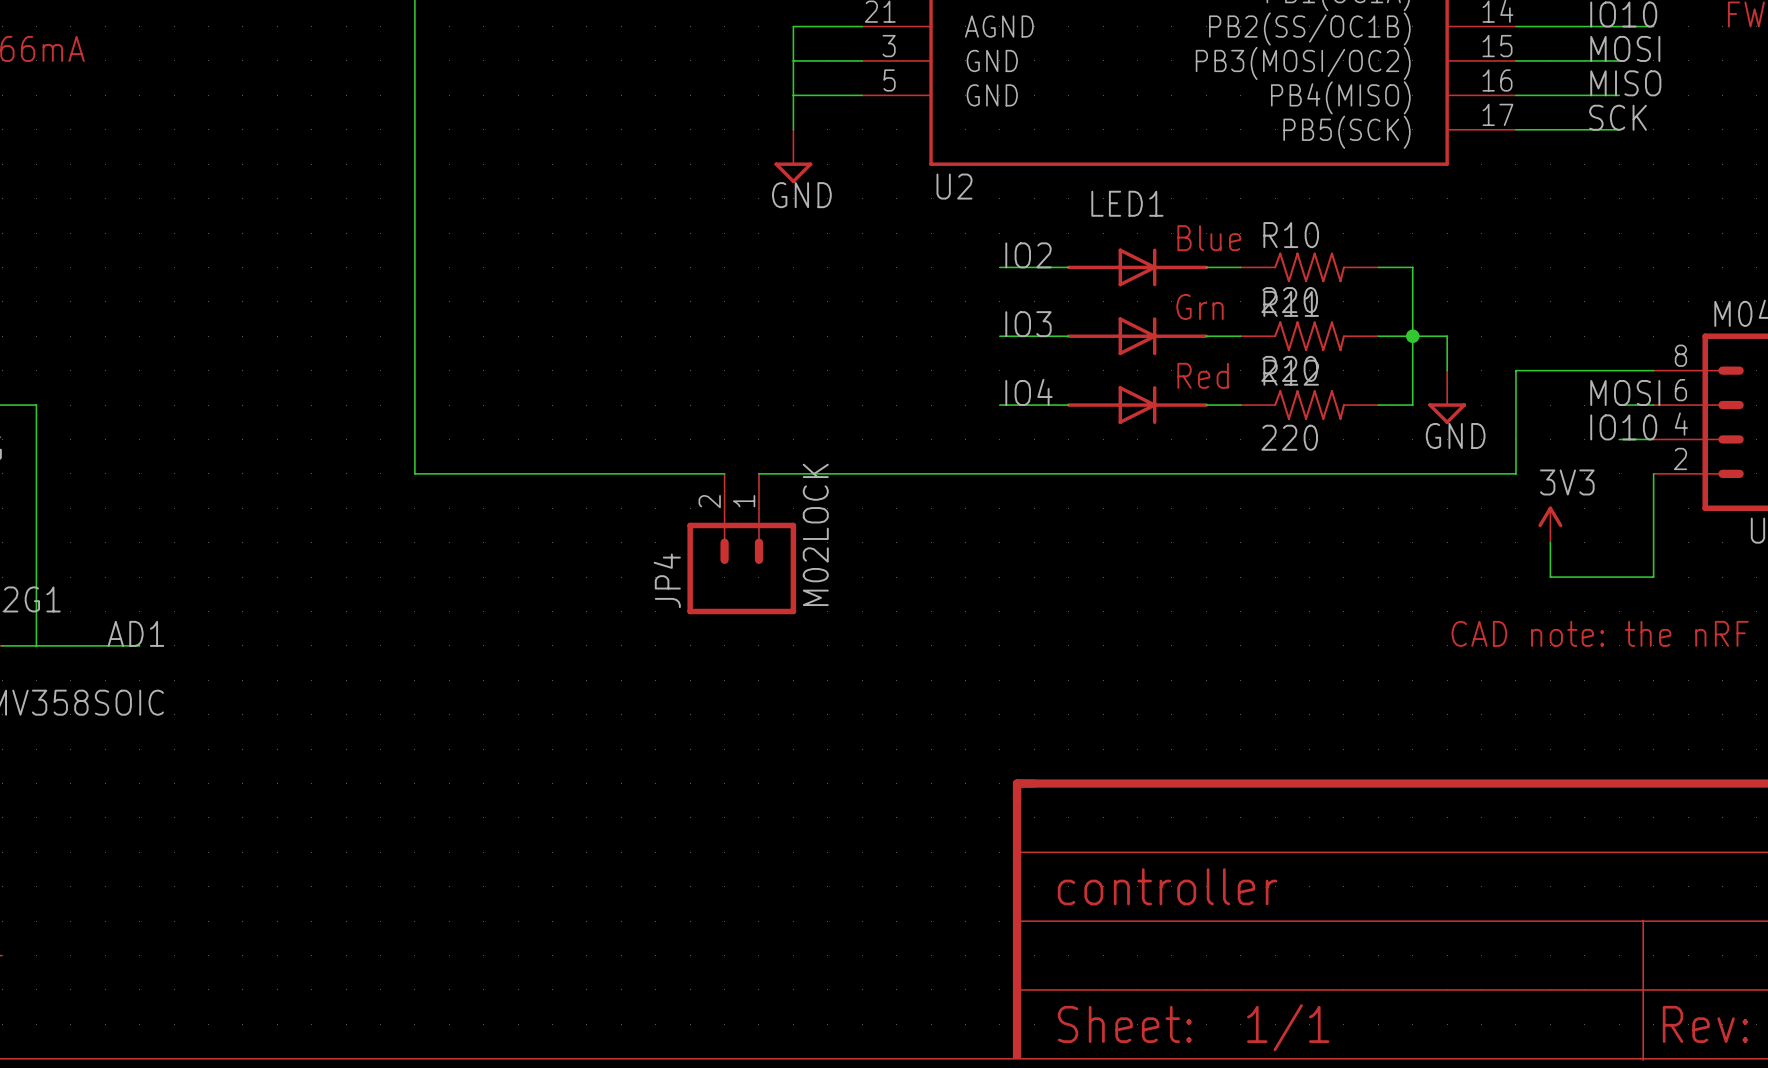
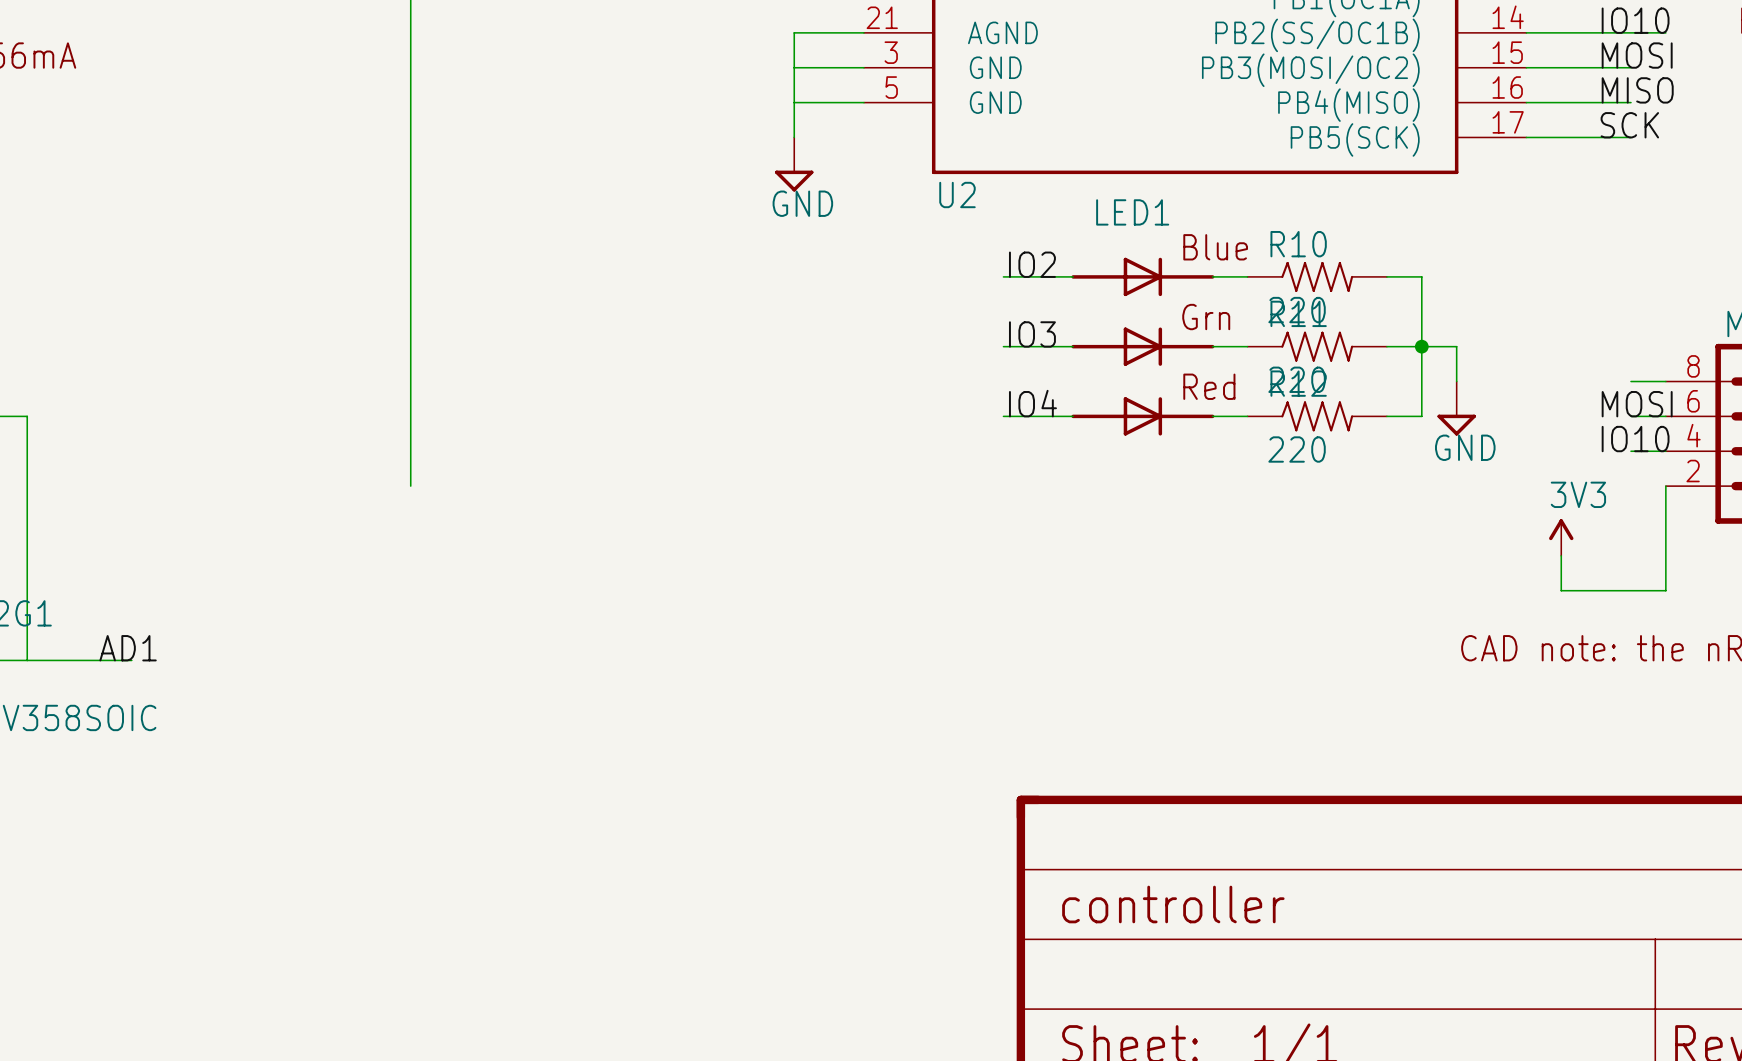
wire: (1619, 370) (1515, 370) (1515, 473) (758, 473) -> none
wire: (414, 473) (724, 473) -> none
JP4: M02LOCK (741, 544) -> none

